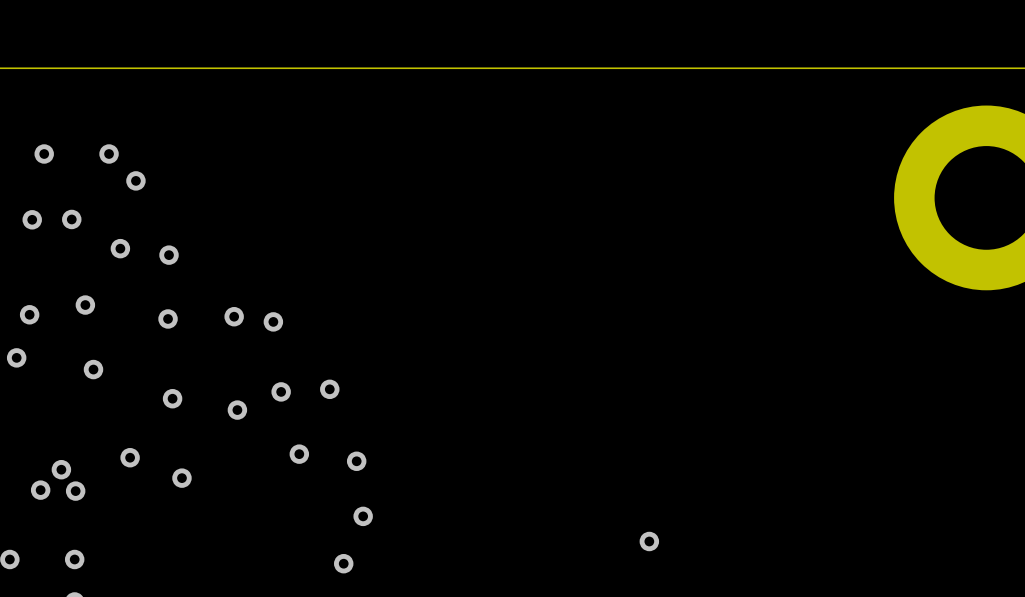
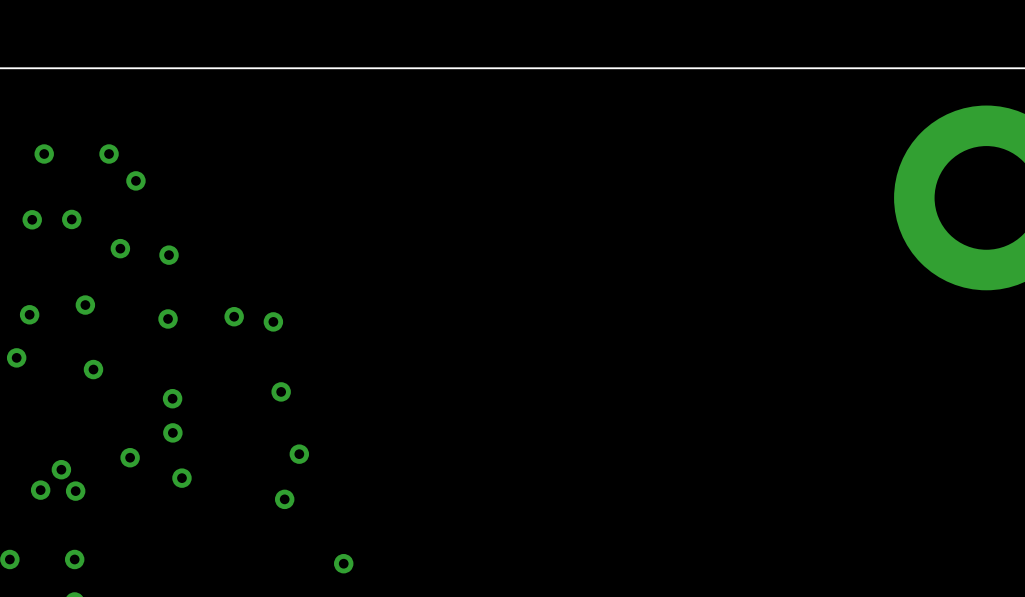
via: (329, 389) -> none
via: (237, 410) -> none
via: none -> (172, 432)
via: (356, 461) -> none
via: none -> (284, 499)
via: (363, 516) -> none
via: (649, 541) -> none

